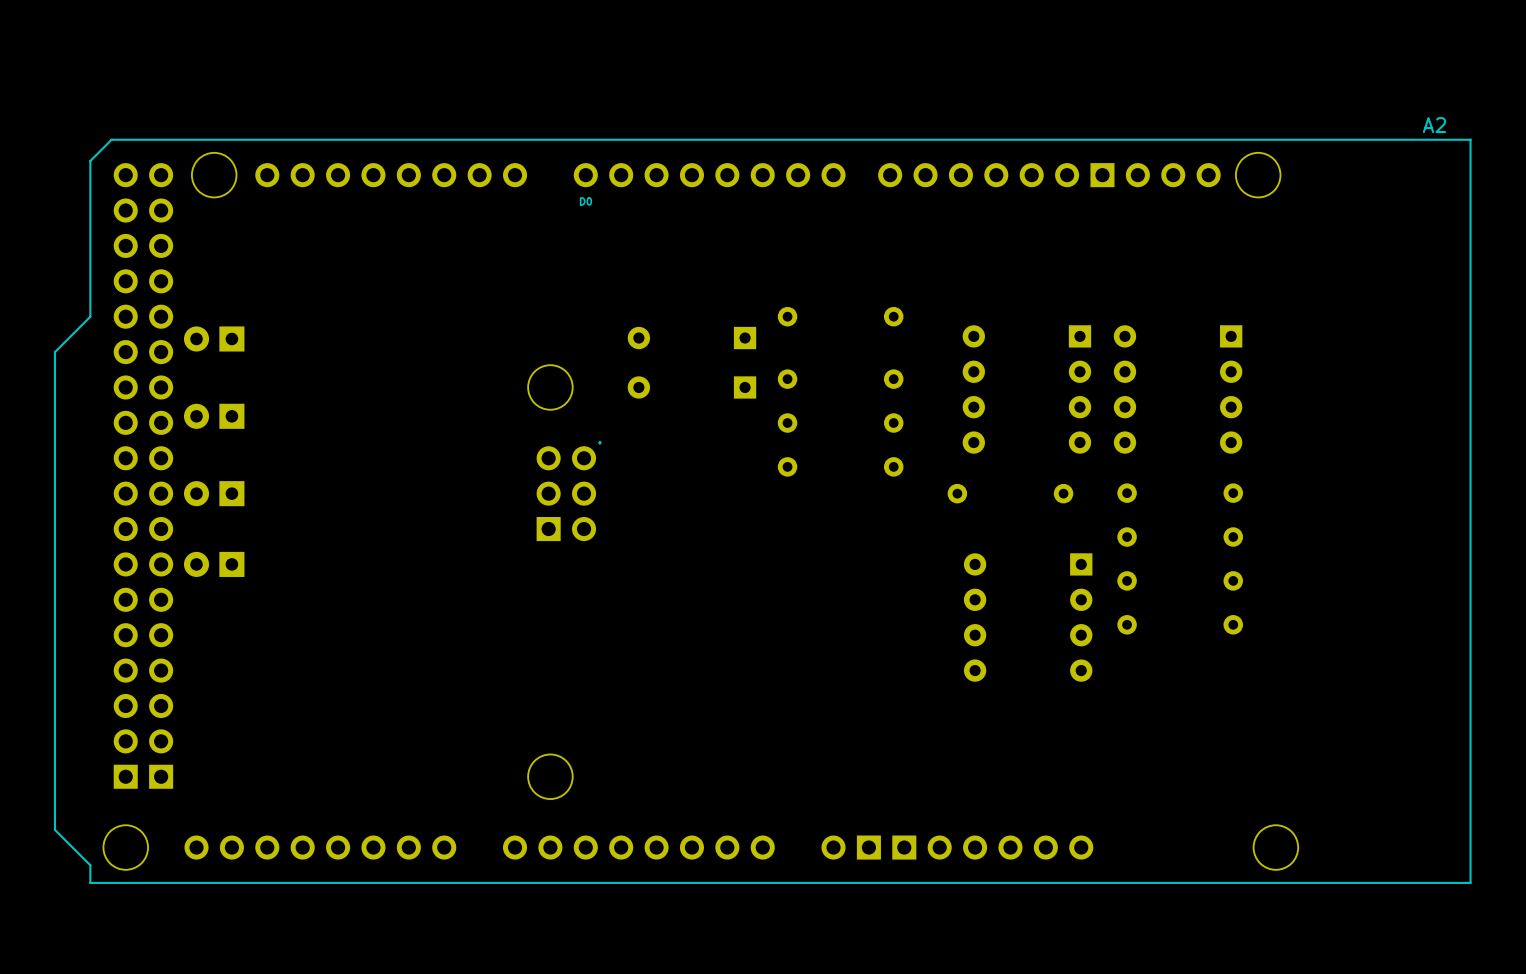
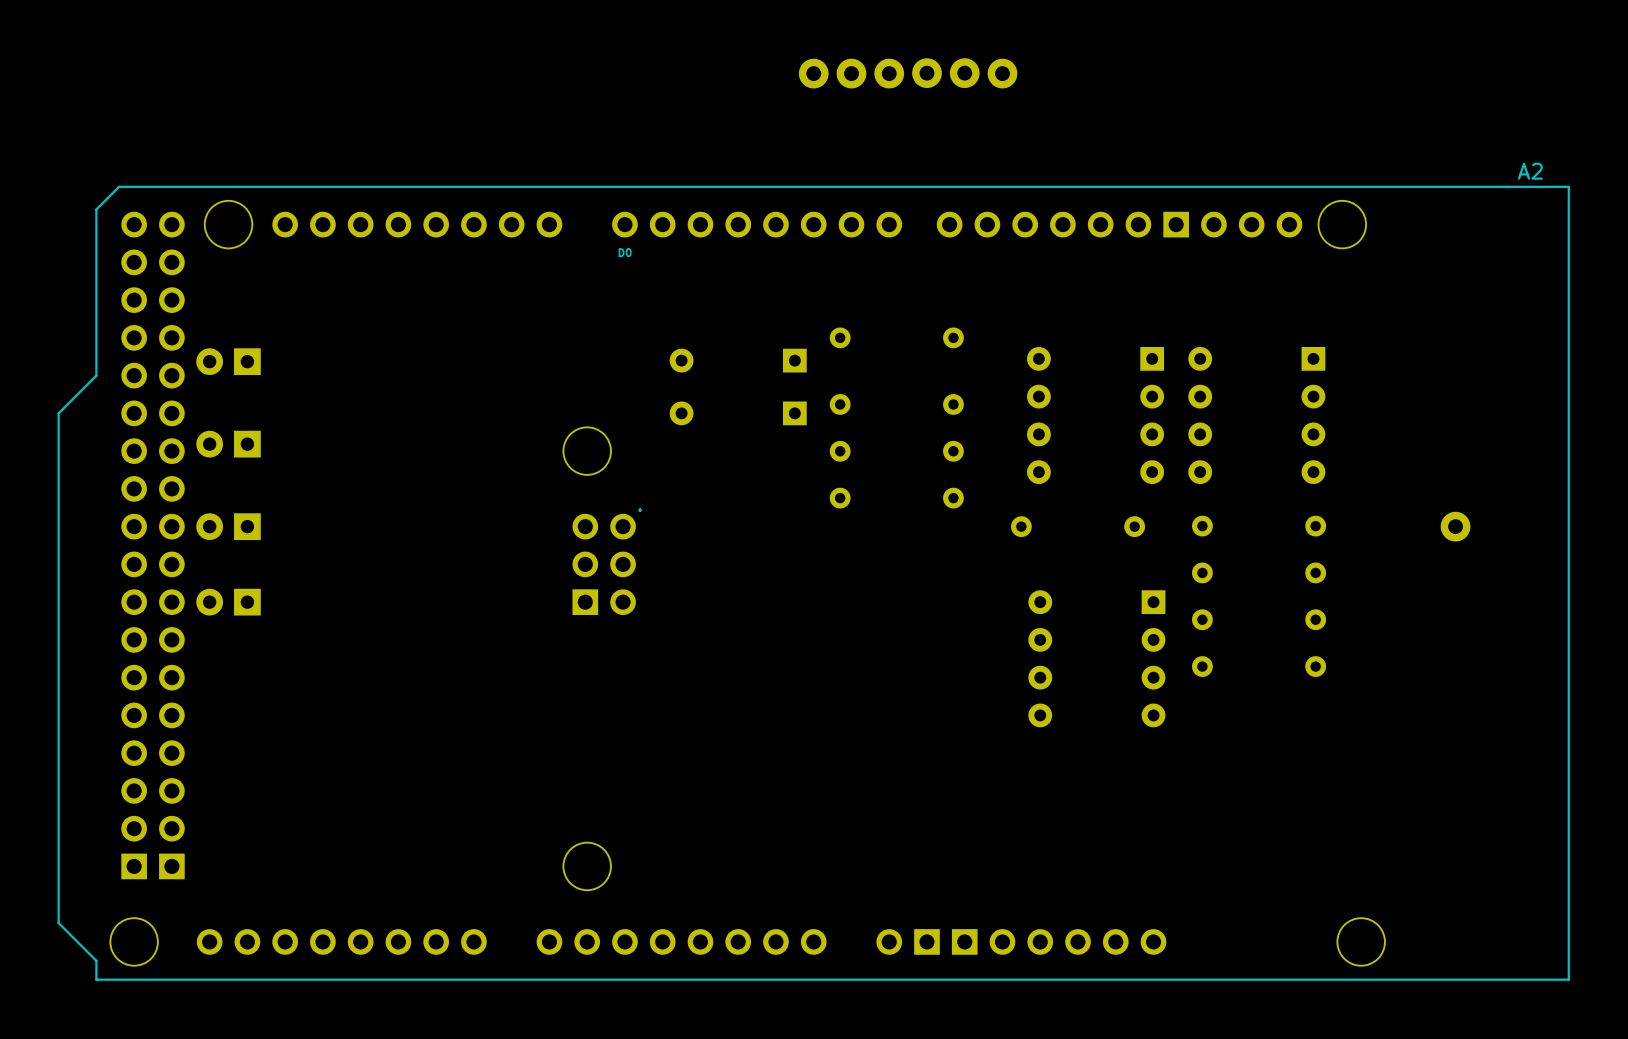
part: none -> (813, 73)
part: none -> (851, 73)
part: none -> (889, 73)
part: none -> (926, 73)
part: none -> (964, 73)
part: none -> (1002, 73)
part: none -> (1455, 526)
A2 position: (762, 511) -> (813, 583)

